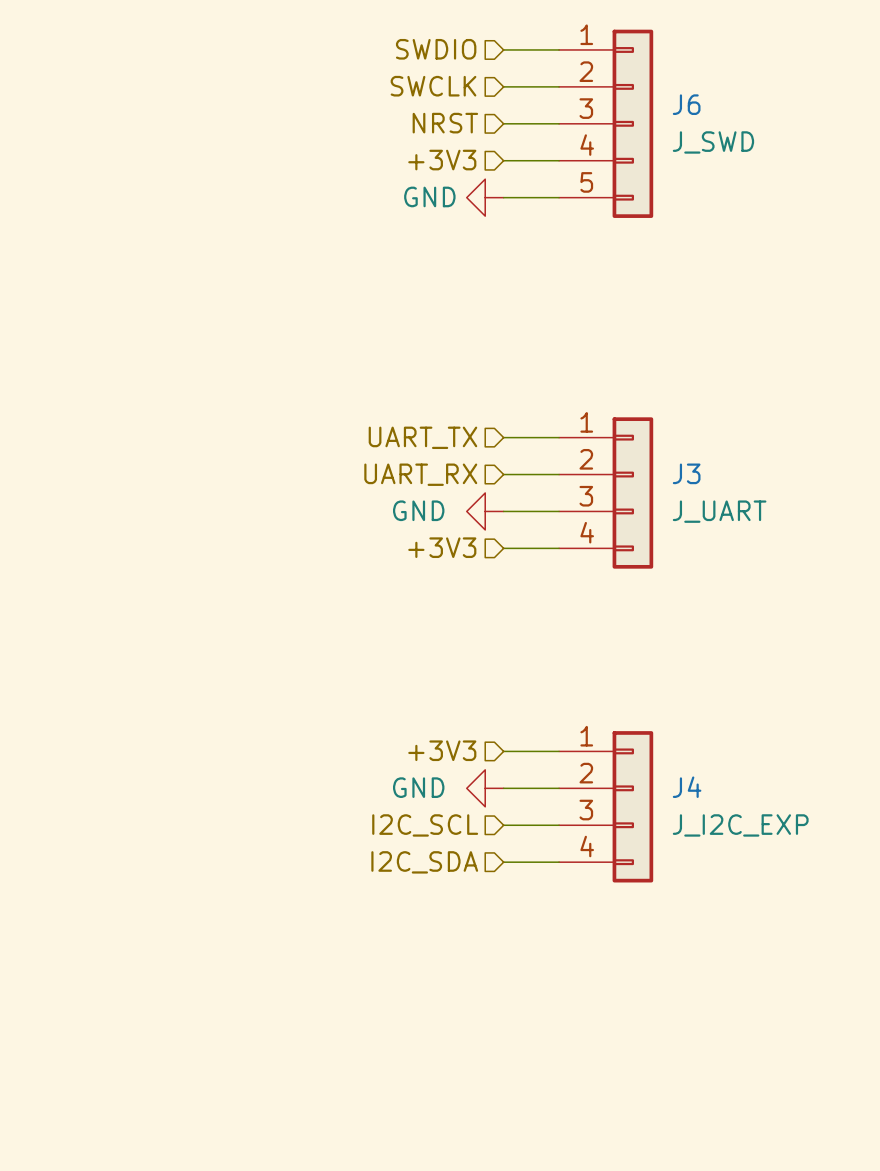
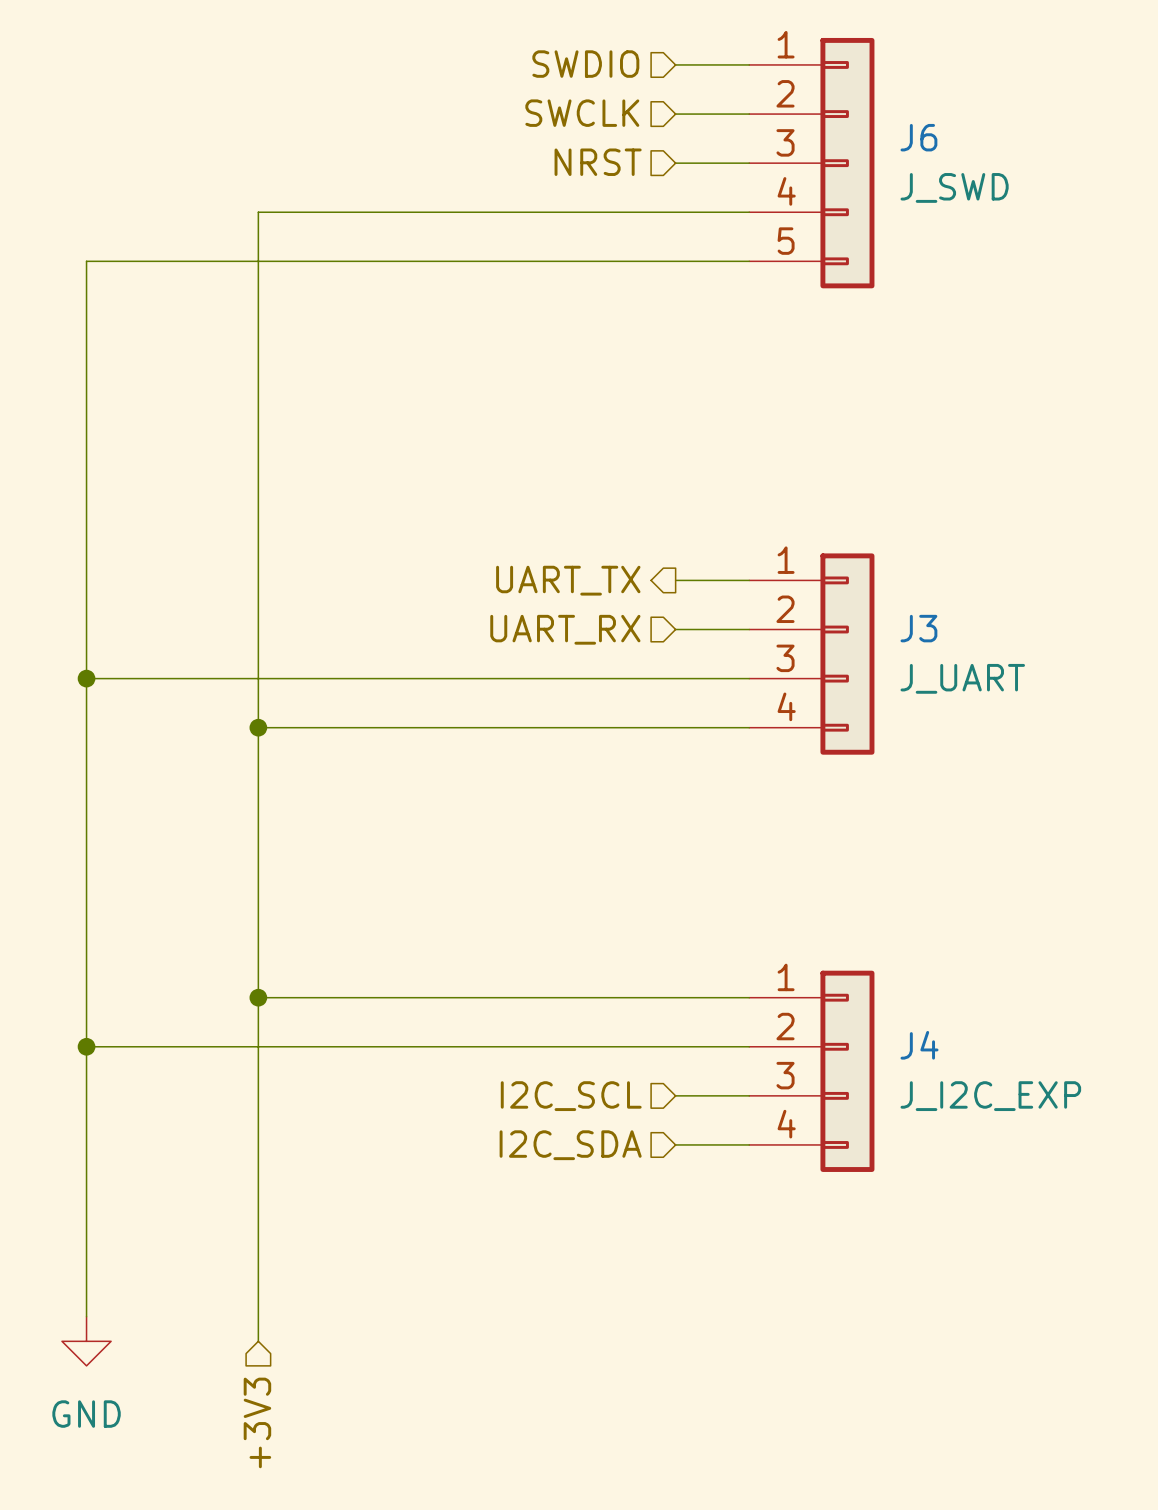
hierarchical label: +3V3 (442, 160) -> none
wire: none -> (675, 212) (258, 212) (258, 1341)
power symbol: GND (485, 197) -> none
wire: none -> (675, 261) (86, 261) (86, 1316)
hierarchical label shape: input (422, 437) -> output (568, 580)
wire: none -> (86, 678) (675, 678)
junction: none -> (86, 678)
power symbol: GND (485, 511) -> none
hierarchical label: +3V3 (442, 547) -> none
wire: none -> (258, 727) (675, 727)
junction: none -> (258, 727)
hierarchical label: +3V3 (442, 750) -> none
wire: none -> (258, 997) (675, 997)
junction: none -> (258, 997)
wire: none -> (86, 1046) (675, 1046)
junction: none -> (86, 1046)
power symbol: GND (485, 788) -> none
power symbol: none -> GND (86, 1341)
hierarchical label: none -> +3V3 (257, 1422)

